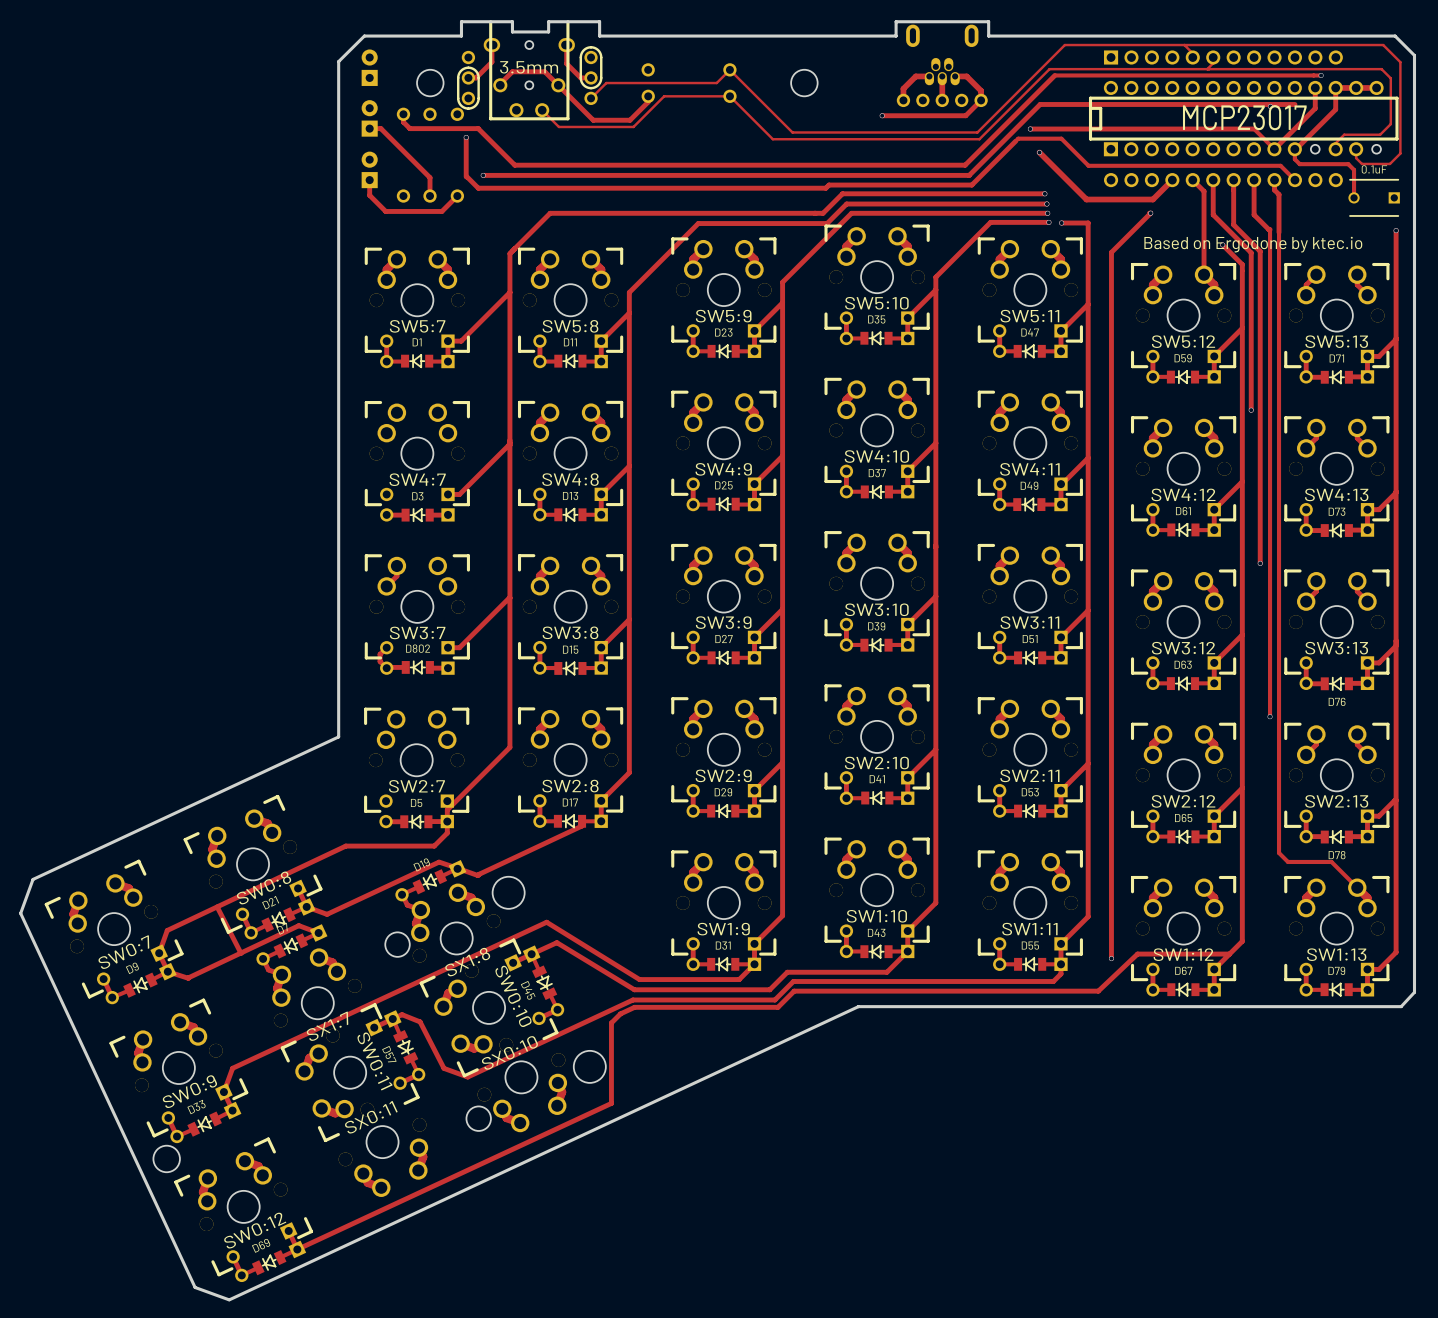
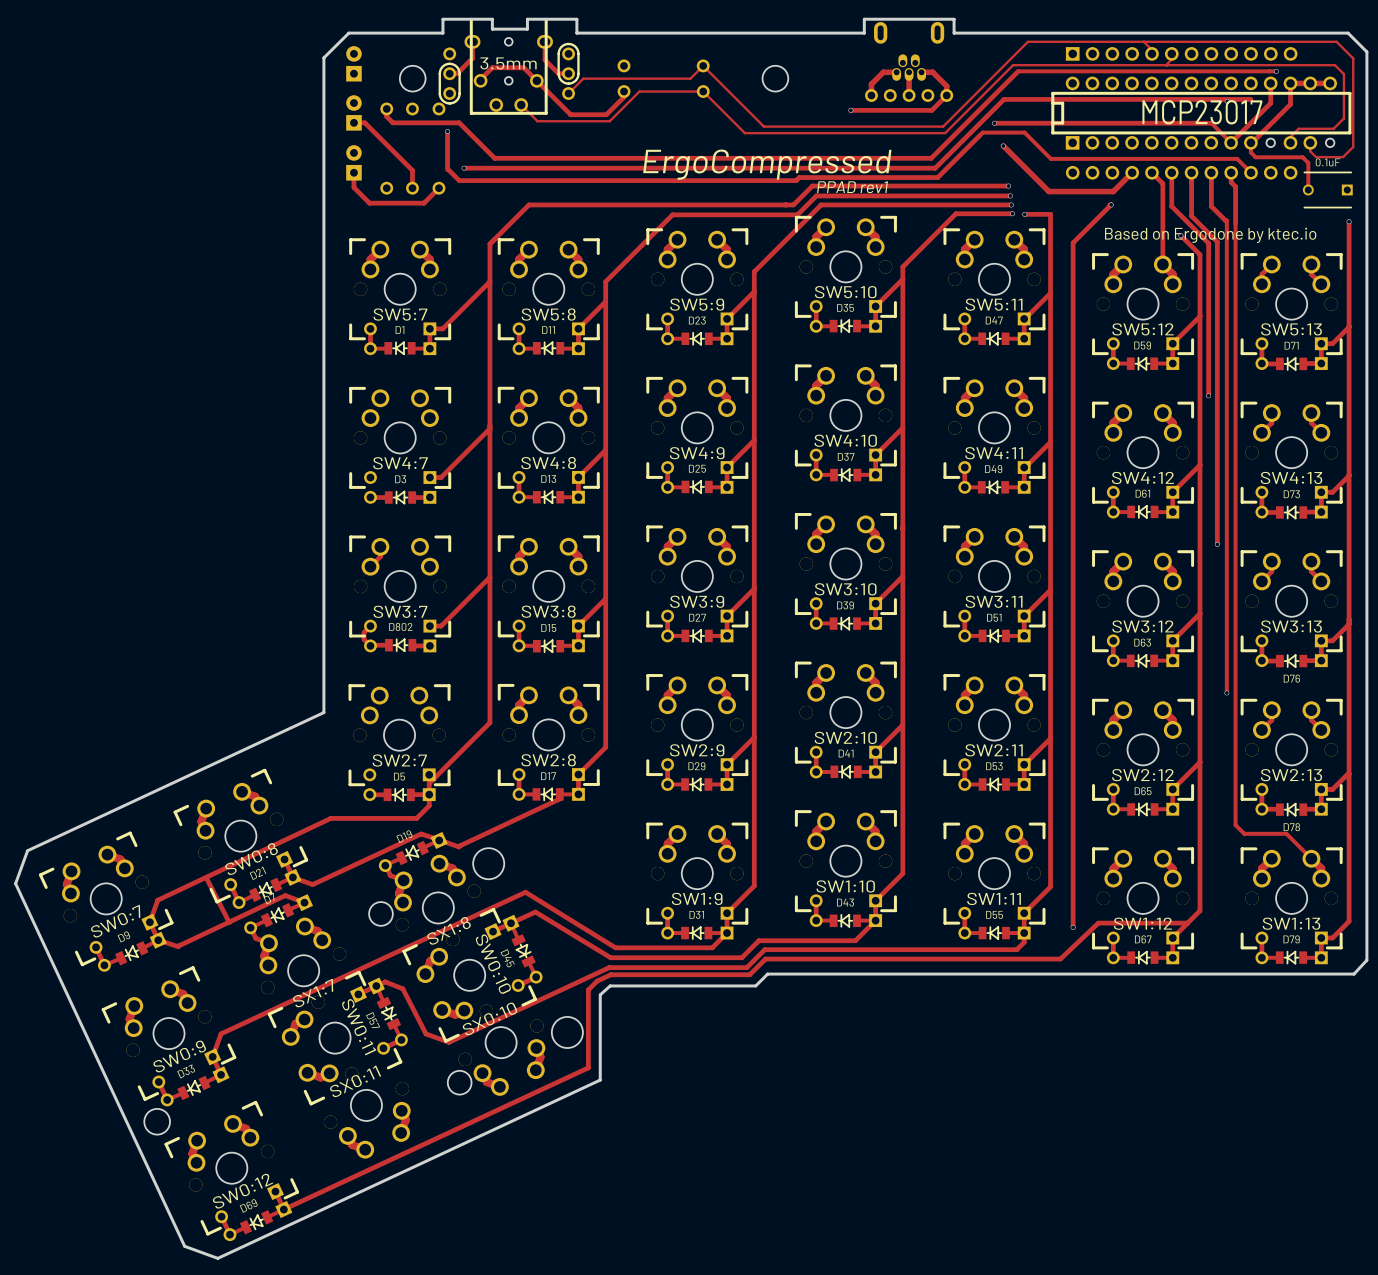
text: none -> ErgoCompressed (767, 164)
text: none -> PPAD rev1 (852, 187)
board edge: (858, 1006) (229, 1299) -> (827, 974) (767, 974) (755, 985) (610, 985) (600, 994) (600, 1080) (217, 1258)

